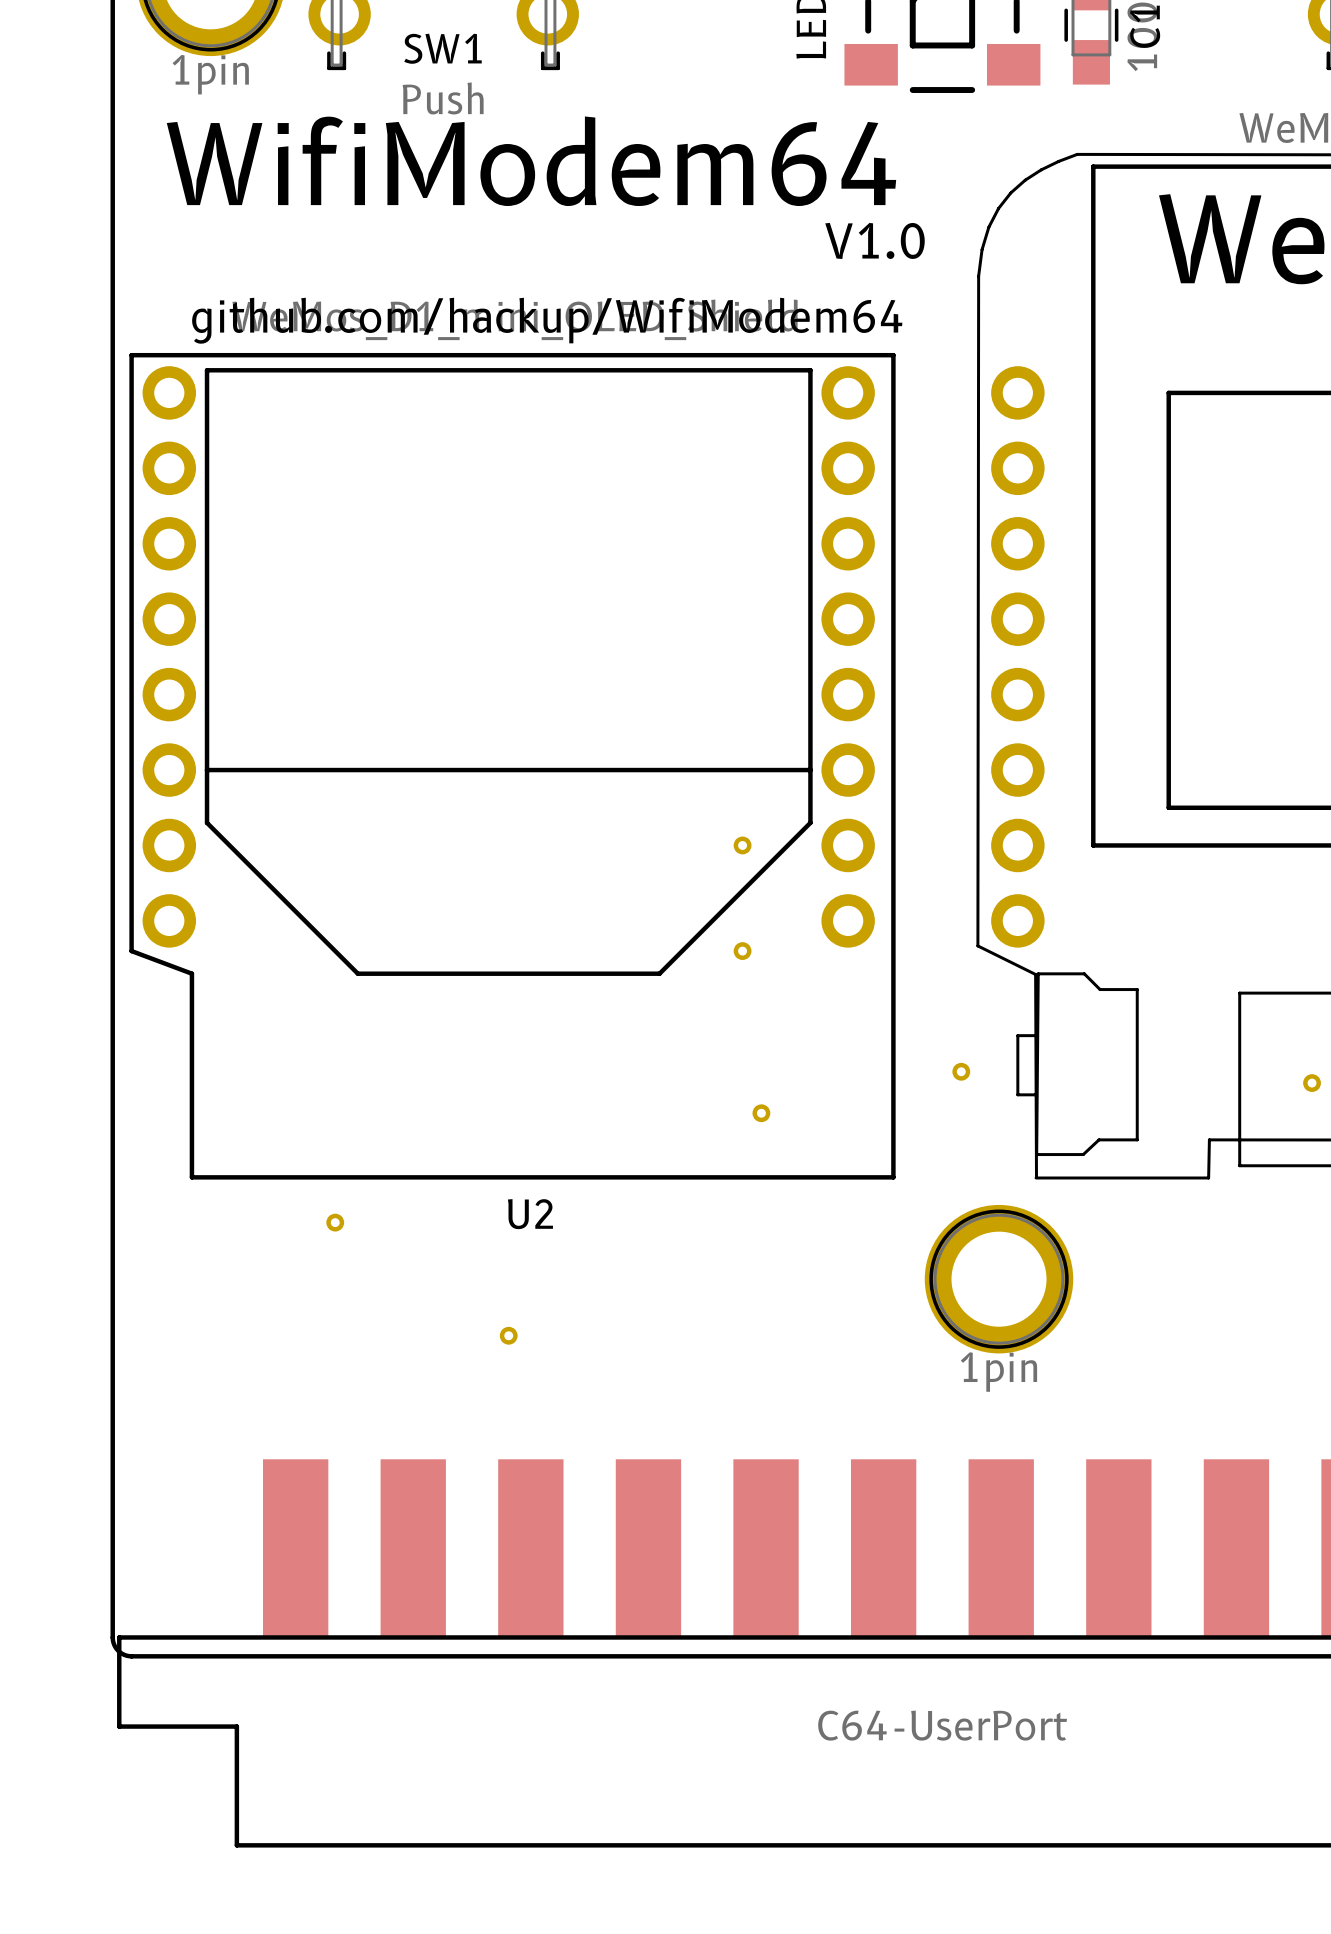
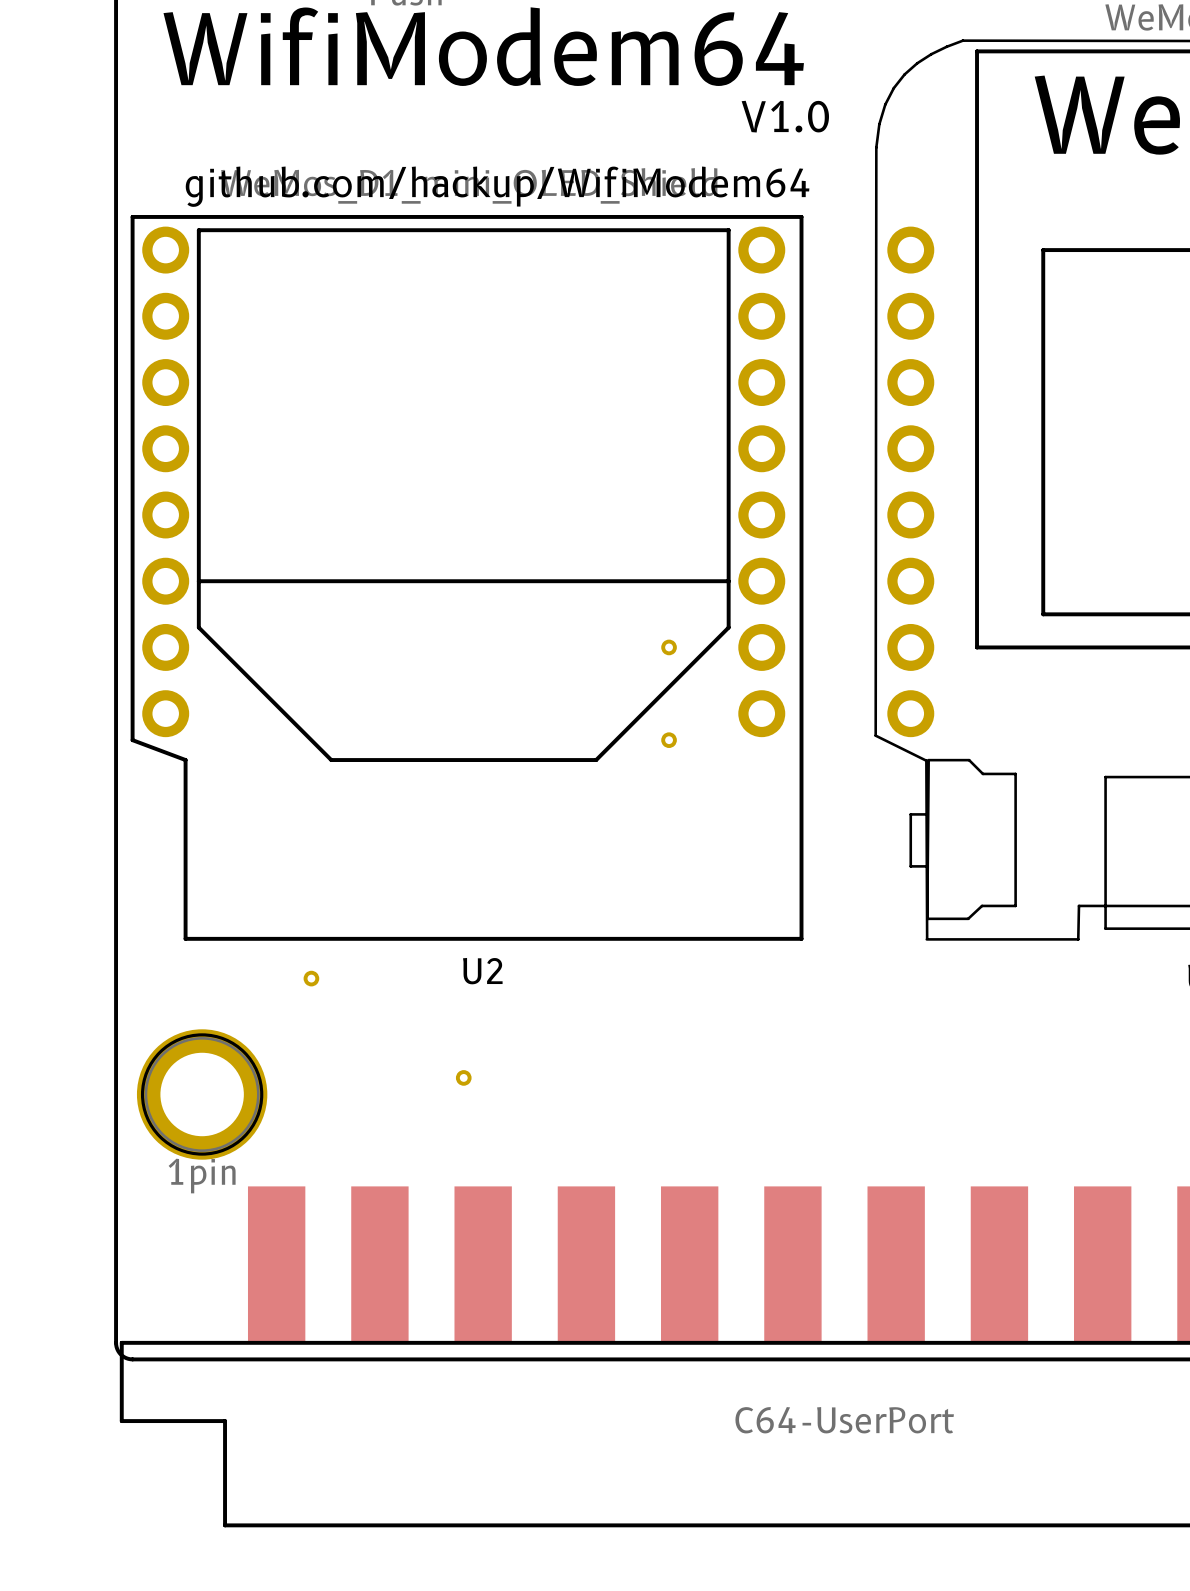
part: (961, 1071) -> none
part: (1312, 1083) -> none
part: (761, 1113) -> none
part: 1pin (999, 1279) -> none
part: none -> 1pin (202, 1094)

